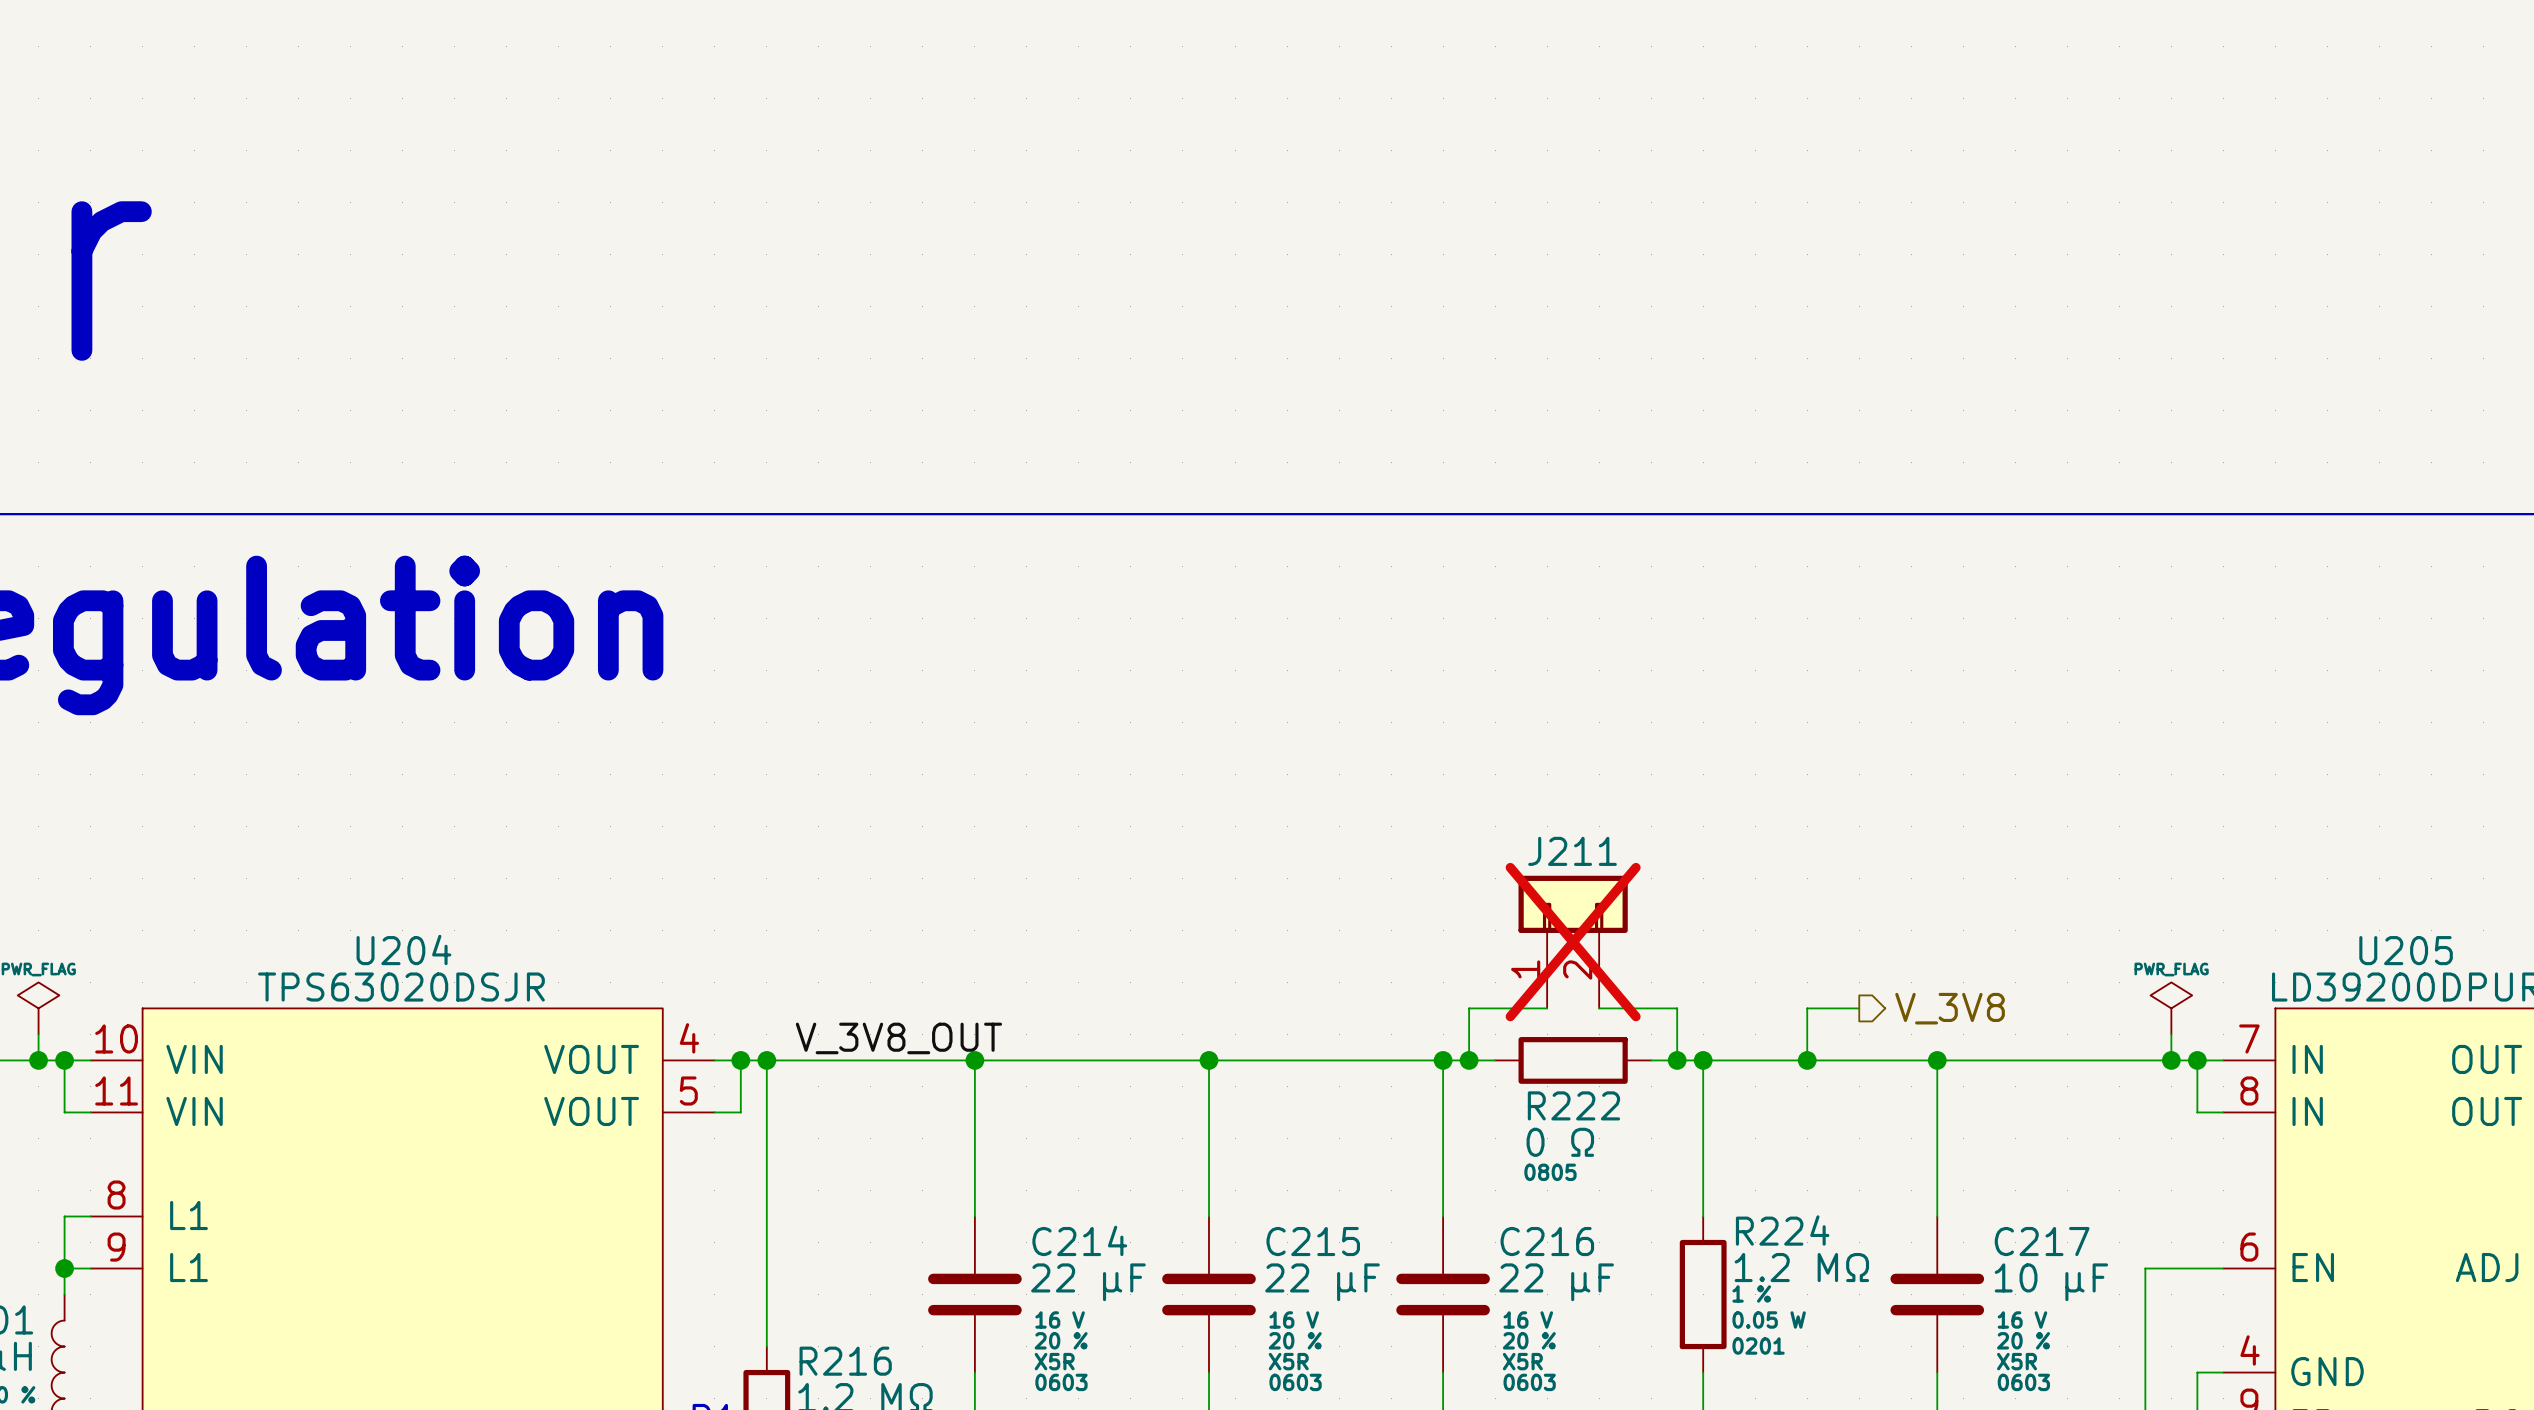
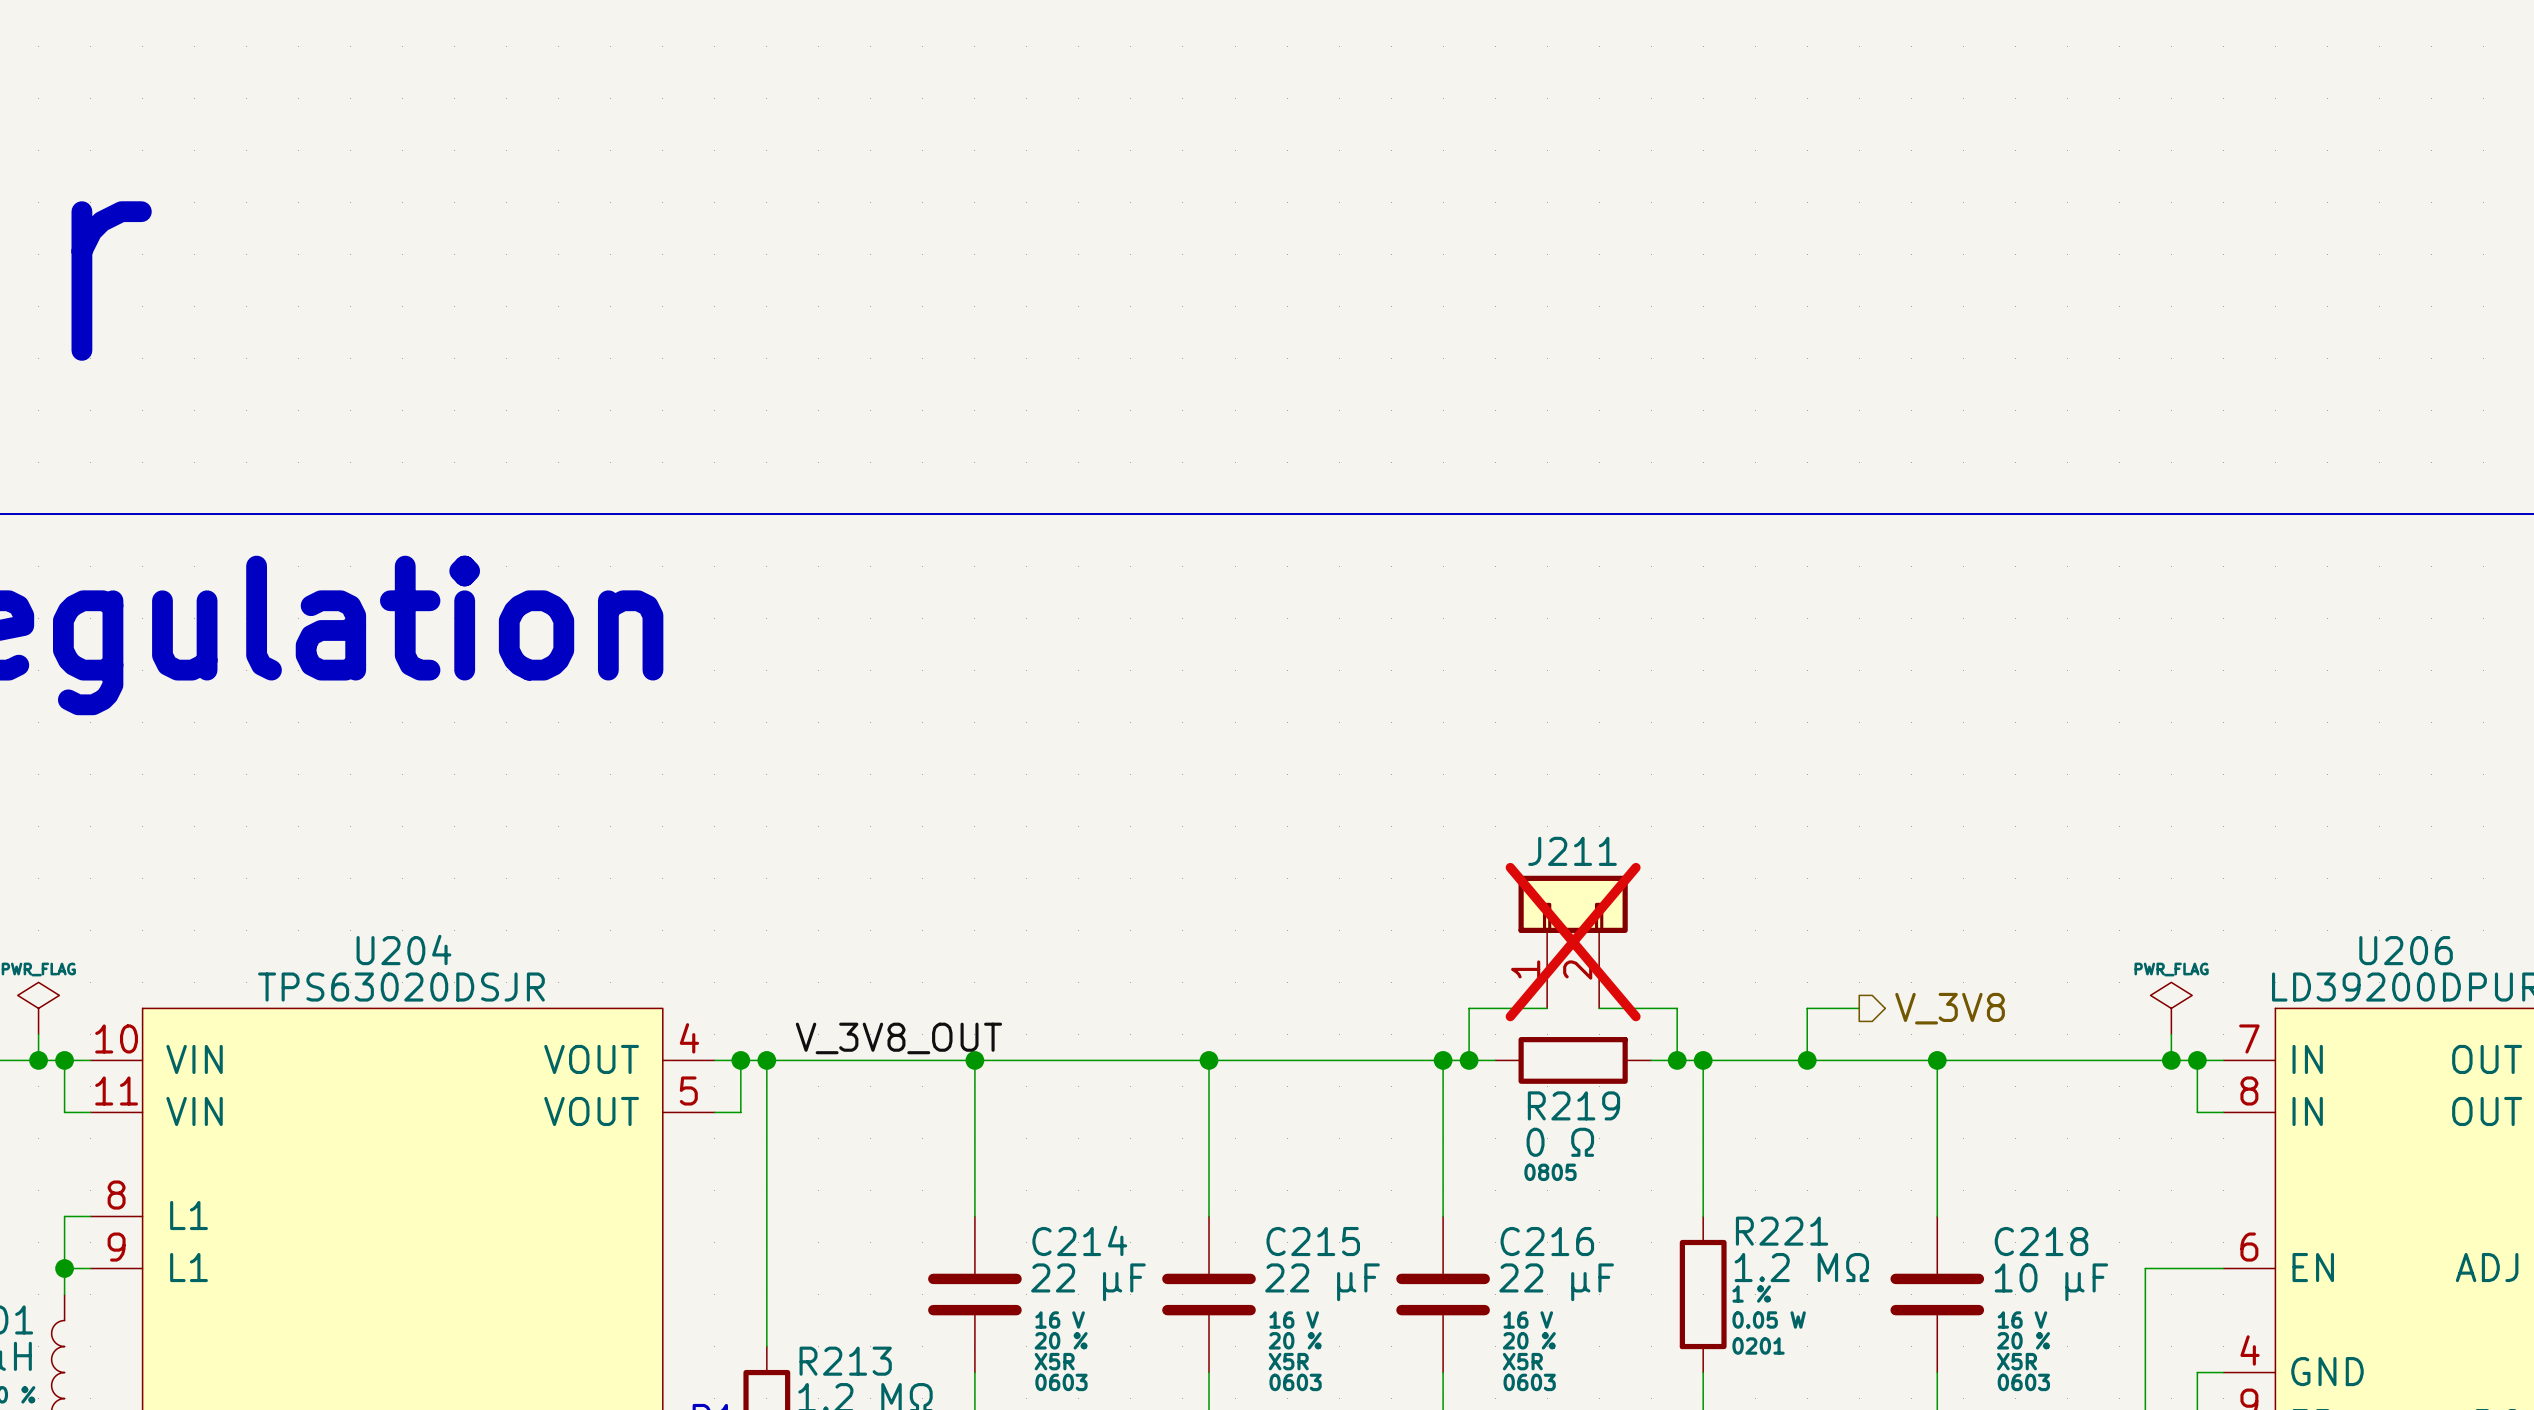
U205 name: U205 (2406, 950) -> U206 (2406, 950)
R222 name: R222 (1573, 1105) -> R219 (1573, 1105)
R224 name: R224 (1782, 1230) -> R221 (1782, 1231)
C217 name: C217 (2042, 1241) -> C218 (2041, 1241)
R216 name: R216 (845, 1361) -> R213 (845, 1361)

